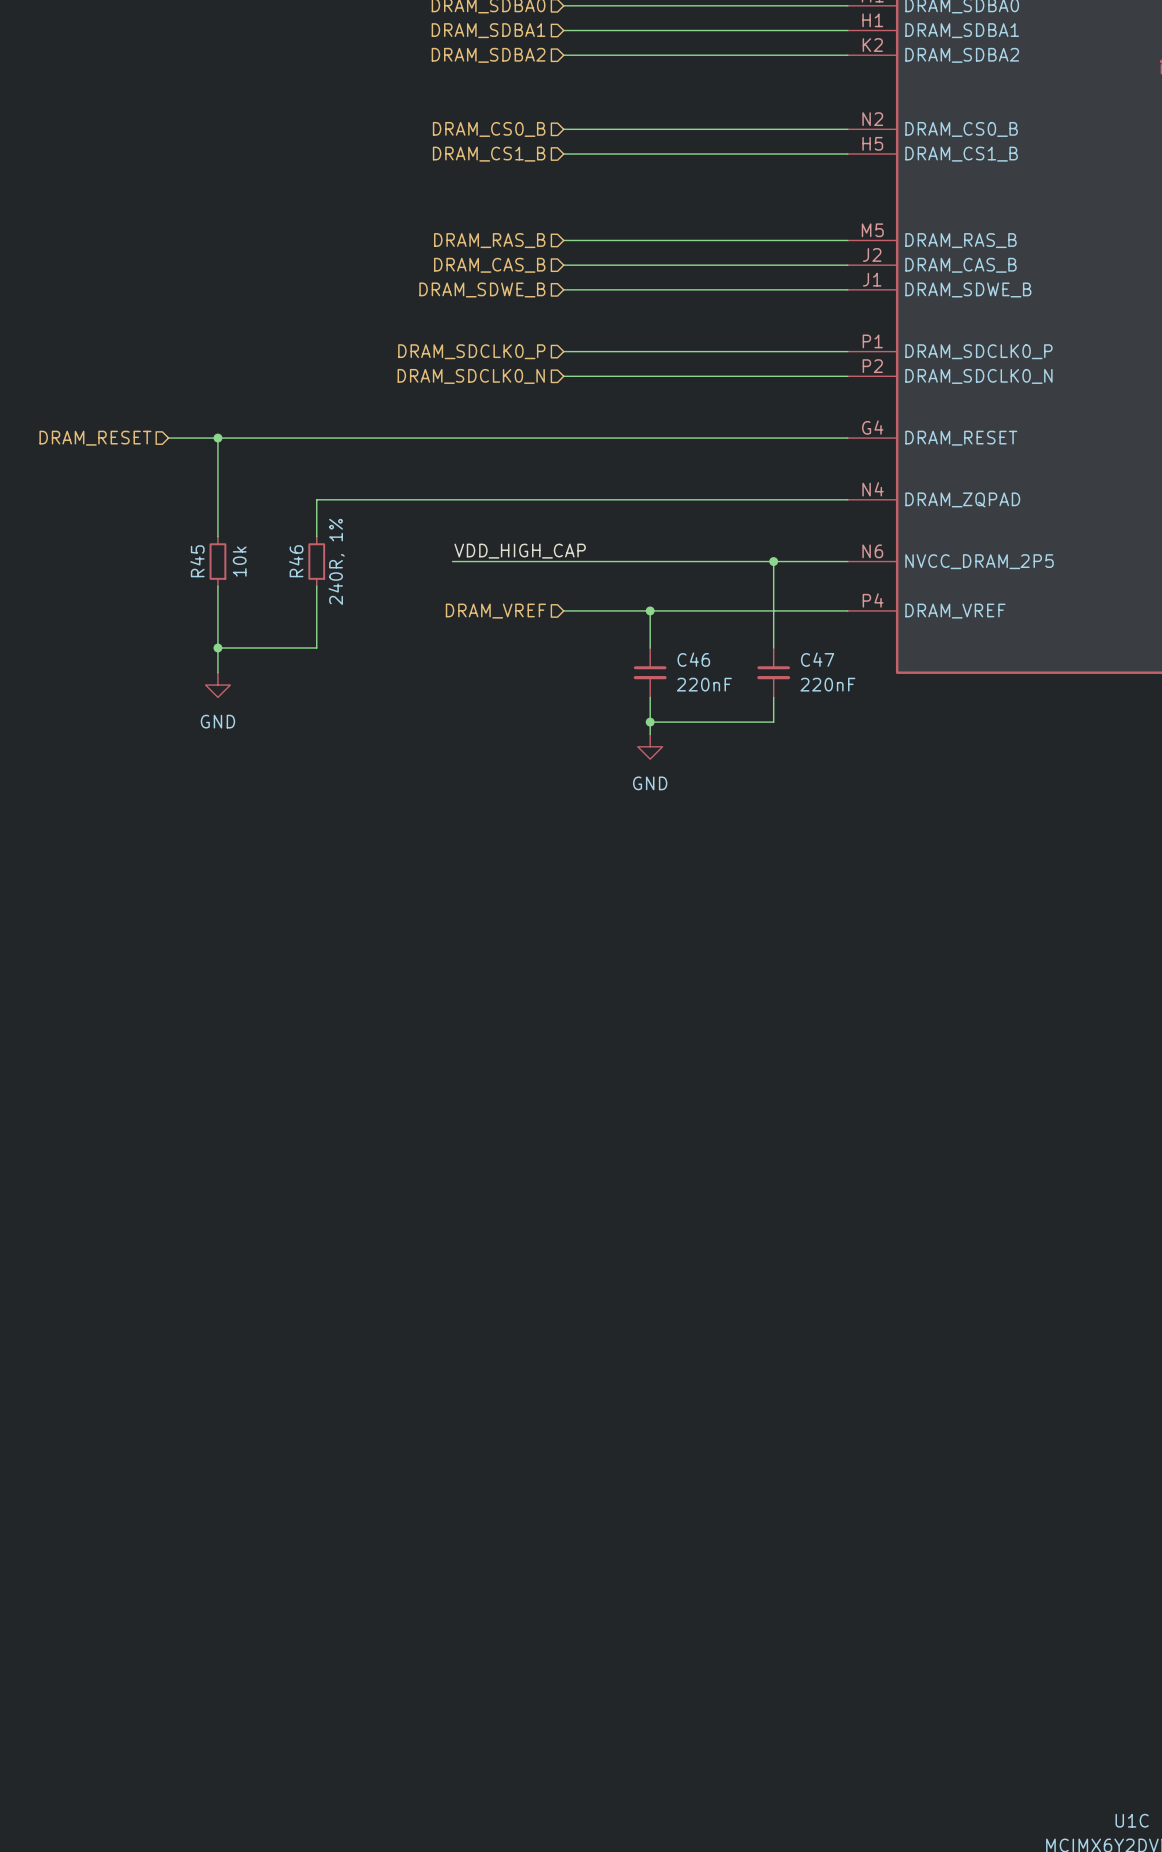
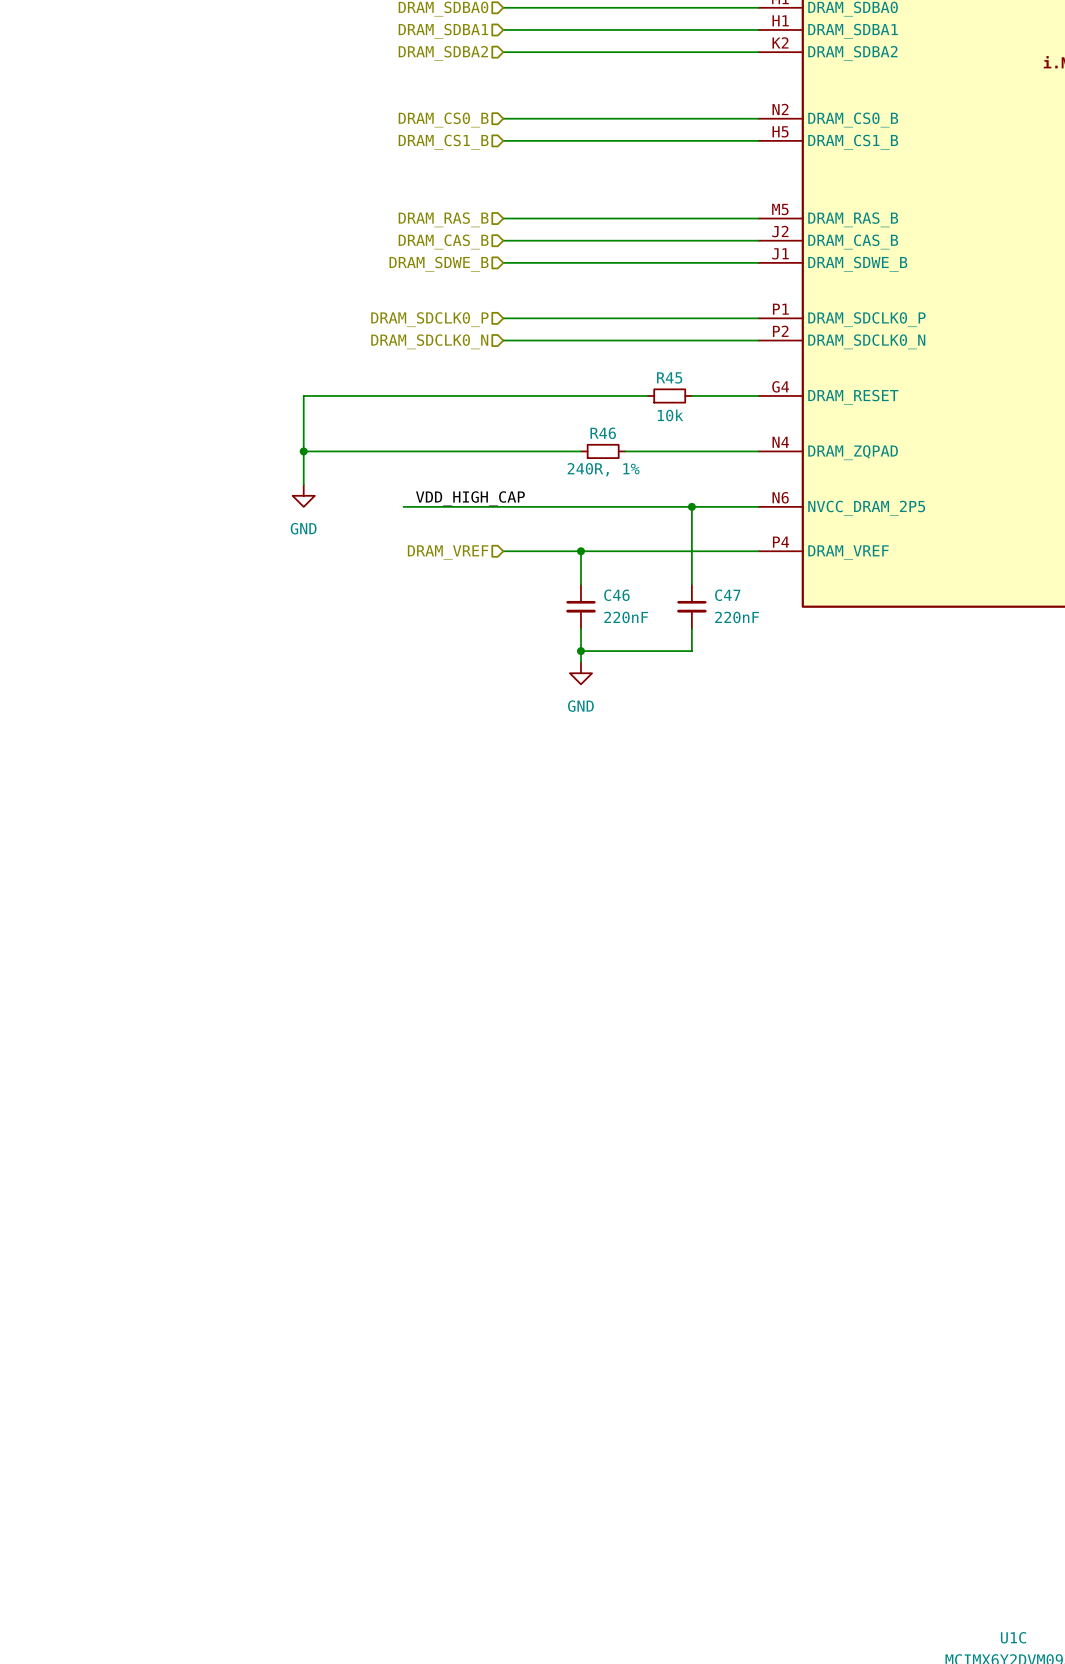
hierarchical label: DRAM_RESET (95, 438) -> none
wire: (168, 438) (341, 438) -> (303, 484) (303, 395)
wire: (217, 438) (217, 536) -> none
junction: (217, 438) -> none
wire: (724, 438) (773, 438) -> none
wire: (341, 499) (316, 499) (316, 536) -> none
junction: none -> (303, 451)
wire: (650, 499) (699, 499) -> none
R45 rotation: 0° (217, 561) -> 90° clockwise (669, 395)
R45 position: (217, 561) -> (669, 395)
R46 rotation: 0° (316, 561) -> 90° clockwise (603, 451)
R46 position: (316, 561) -> (603, 451)
wire: (217, 586) (217, 672) -> none
wire: (316, 586) (316, 648) (217, 648) -> none
junction: (217, 648) -> none
power symbol position: GND (217, 685) -> GND (303, 495)

